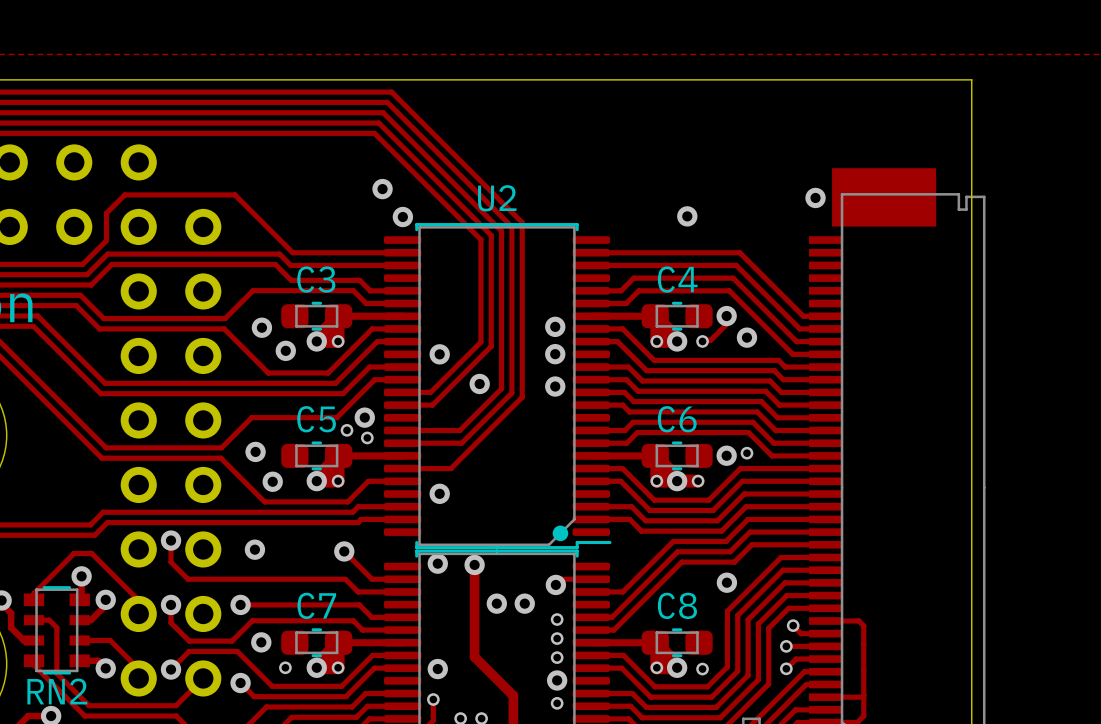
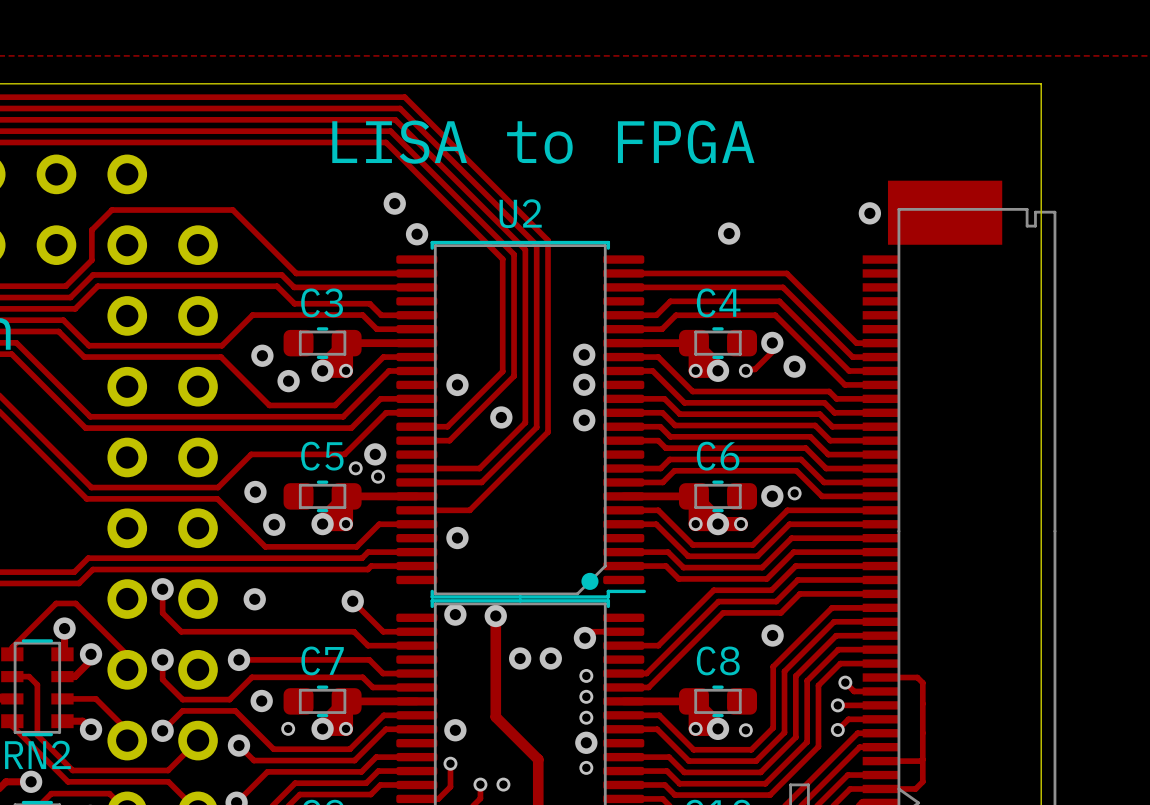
text: none -> LISA to FPGA (543, 142)

